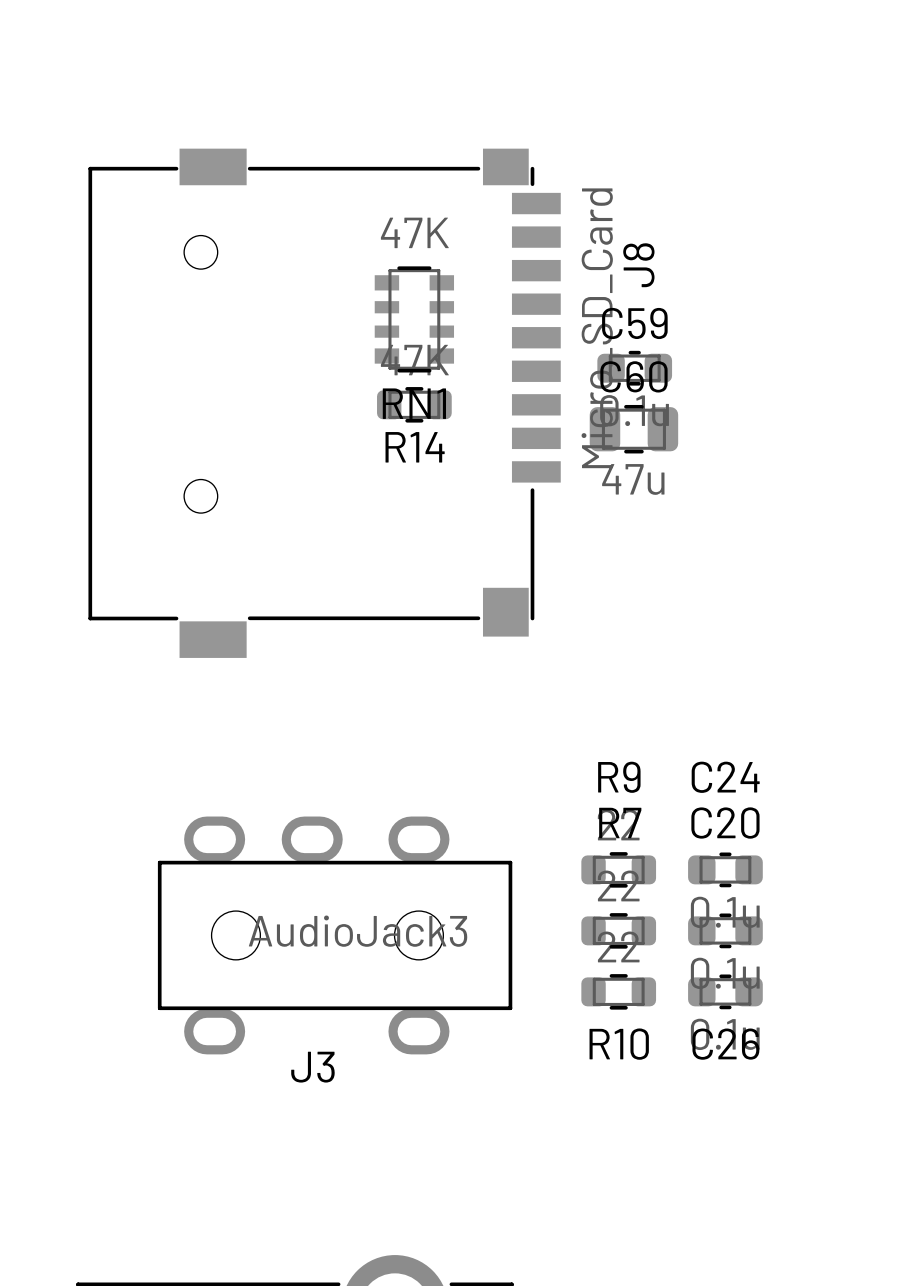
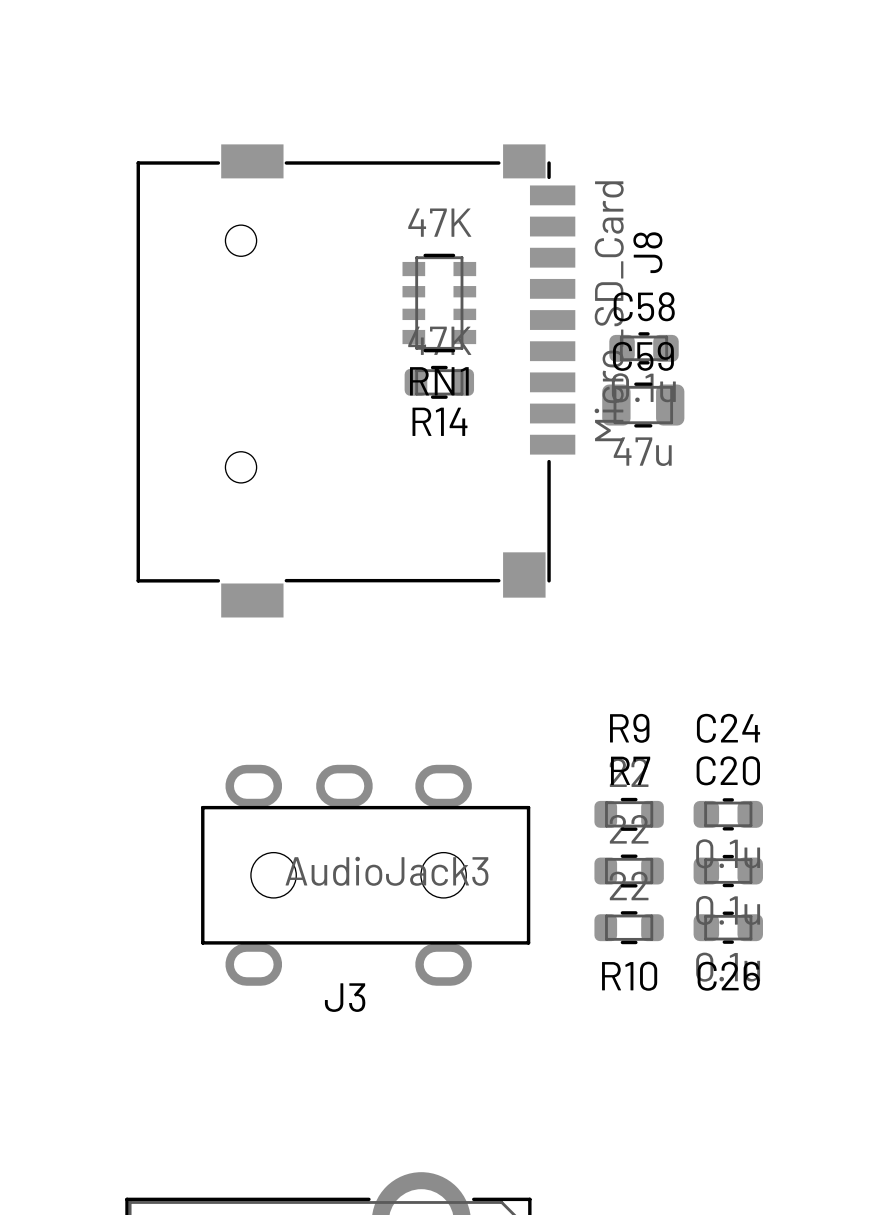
C59 name: C59 (634, 323) -> C58 (644, 306)
C60 name: C60 (633, 376) -> C59 (643, 356)

